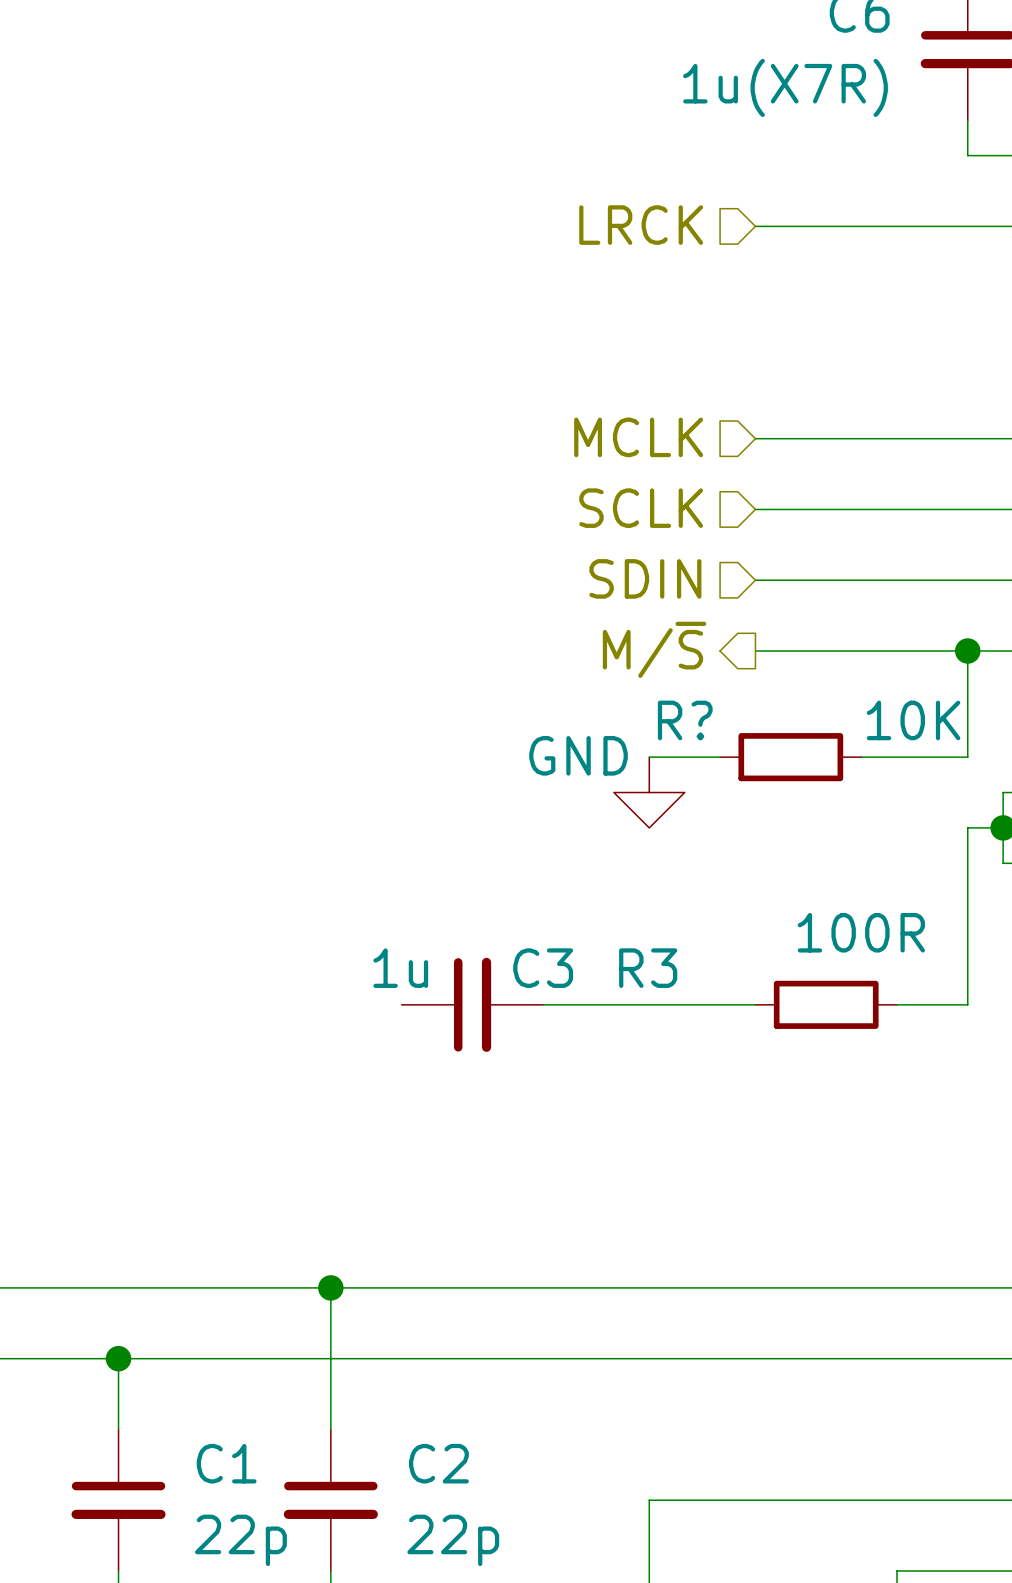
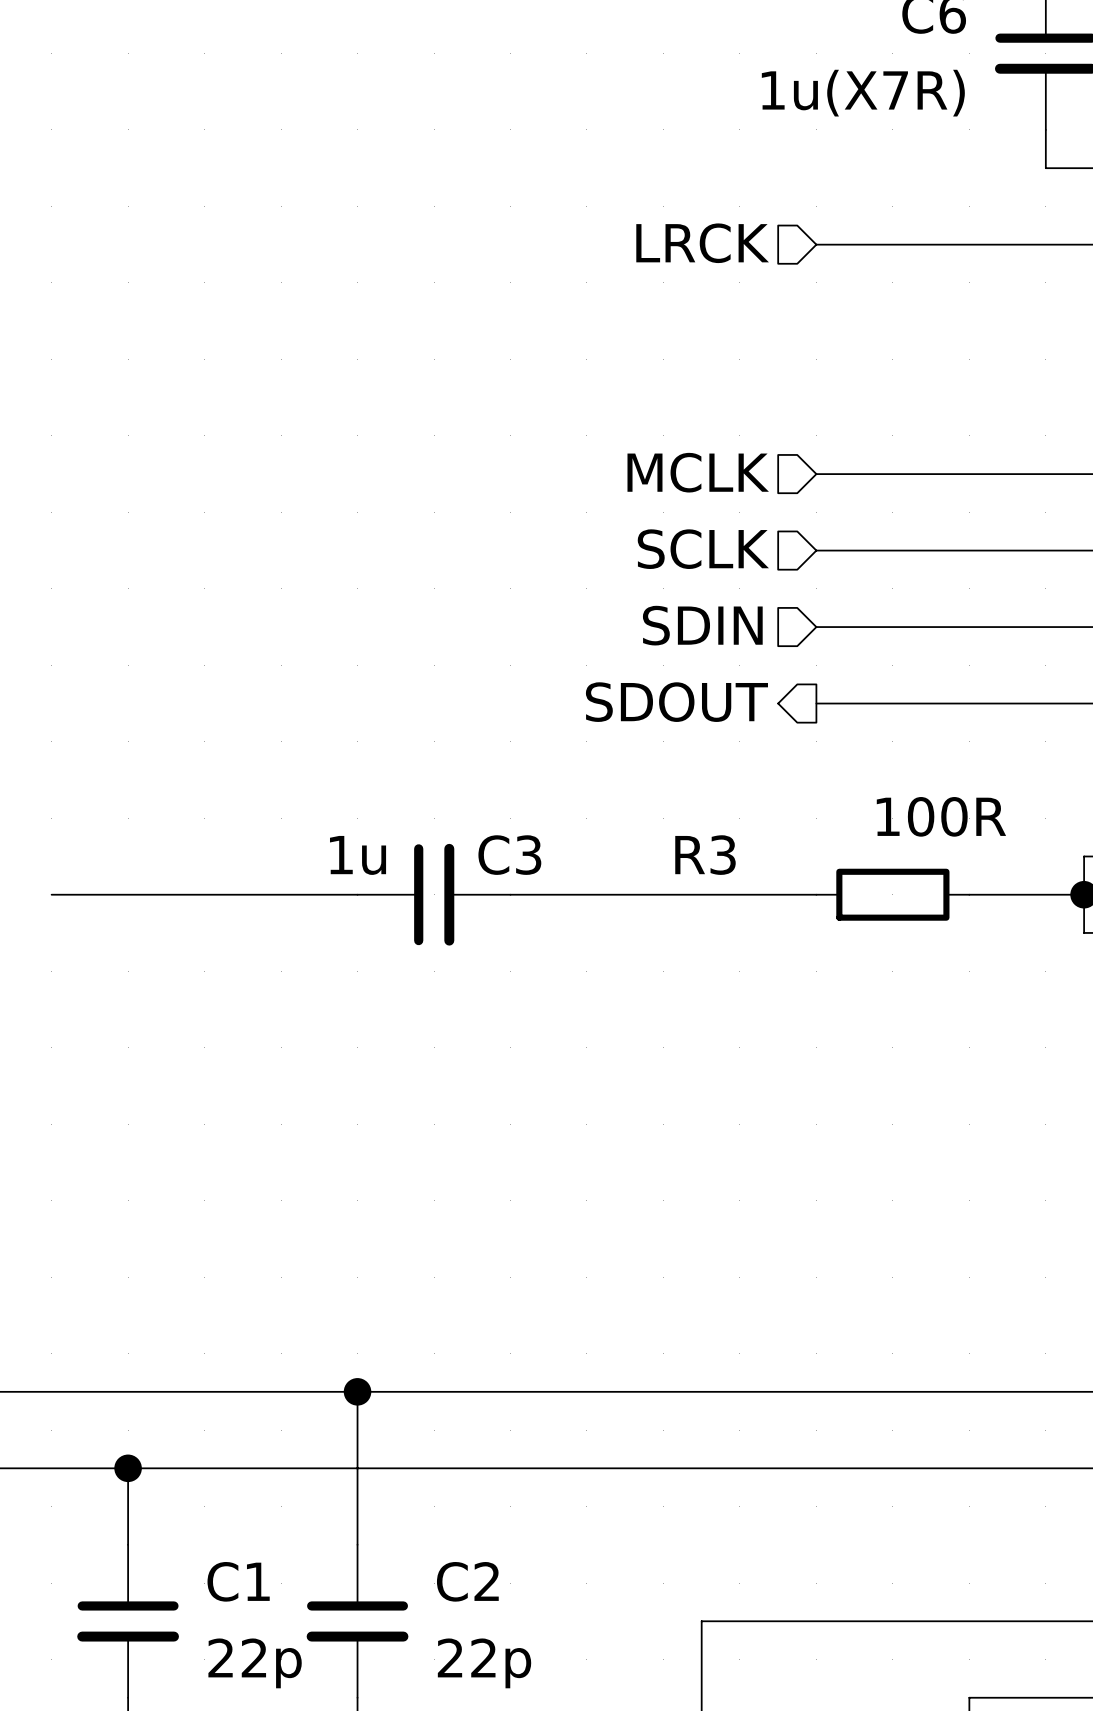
hierarchical label: M/~{S} (654, 649) -> SDOUT (676, 702)
wire: (967, 651) (967, 757) (861, 757) -> none
junction: (967, 651) -> none
wire: (649, 757) (720, 757) -> none
R?: 10K (790, 757) -> none
power symbol: GND (649, 792) -> none
wire: none -> (51, 894) (357, 894)
wire: none -> (510, 894) (816, 894)
wire: (967, 827) (967, 1004) (896, 1004) -> (1045, 894) (969, 894)
C3 position: (472, 1004) -> (434, 894)
wire: (543, 1004) (755, 1004) -> none
R3 position: (826, 1004) -> (892, 894)

